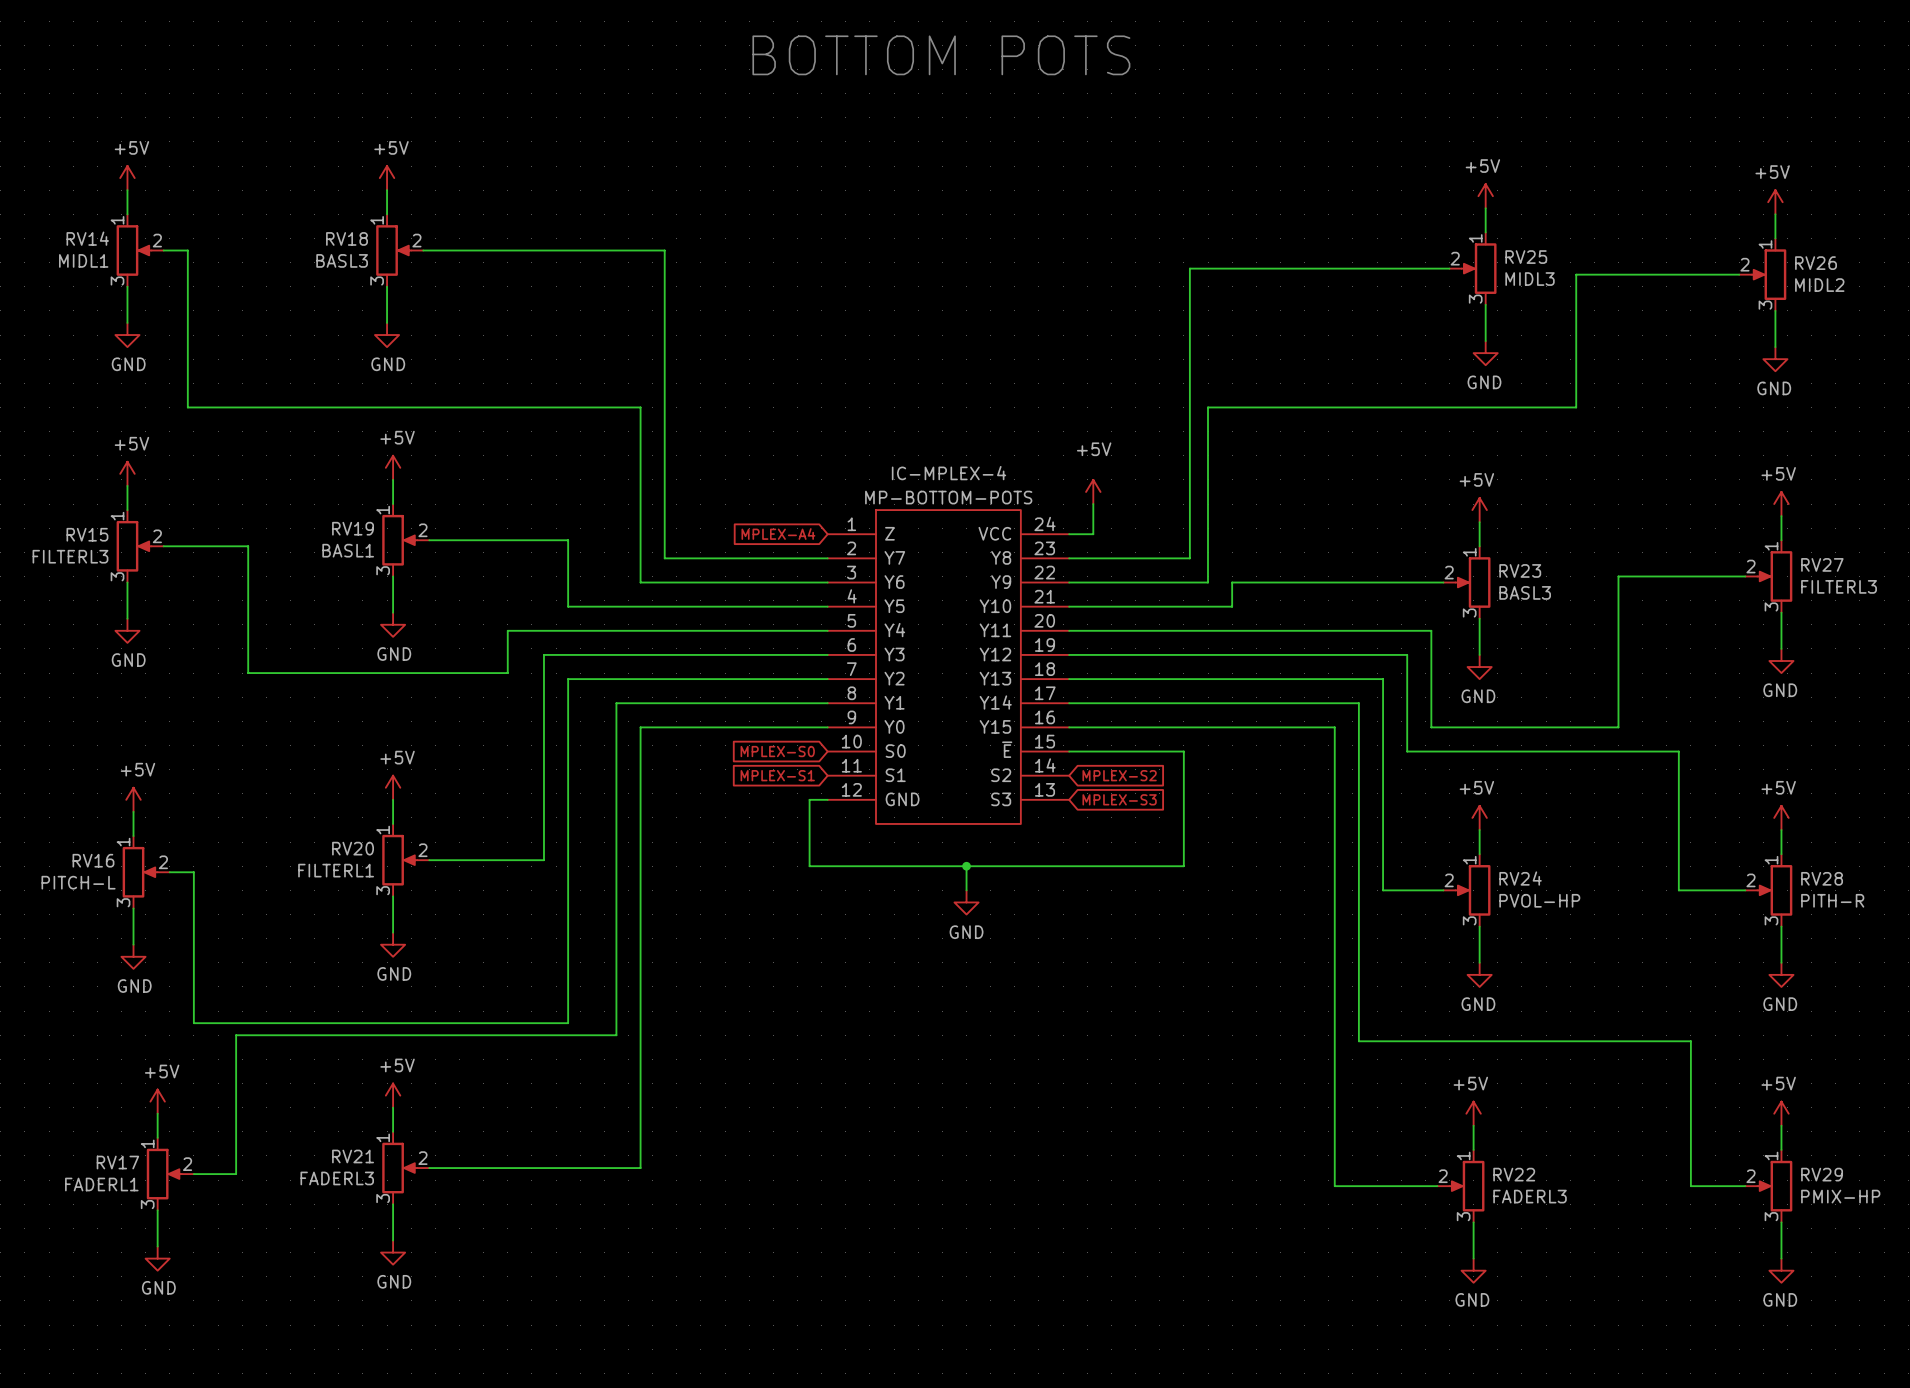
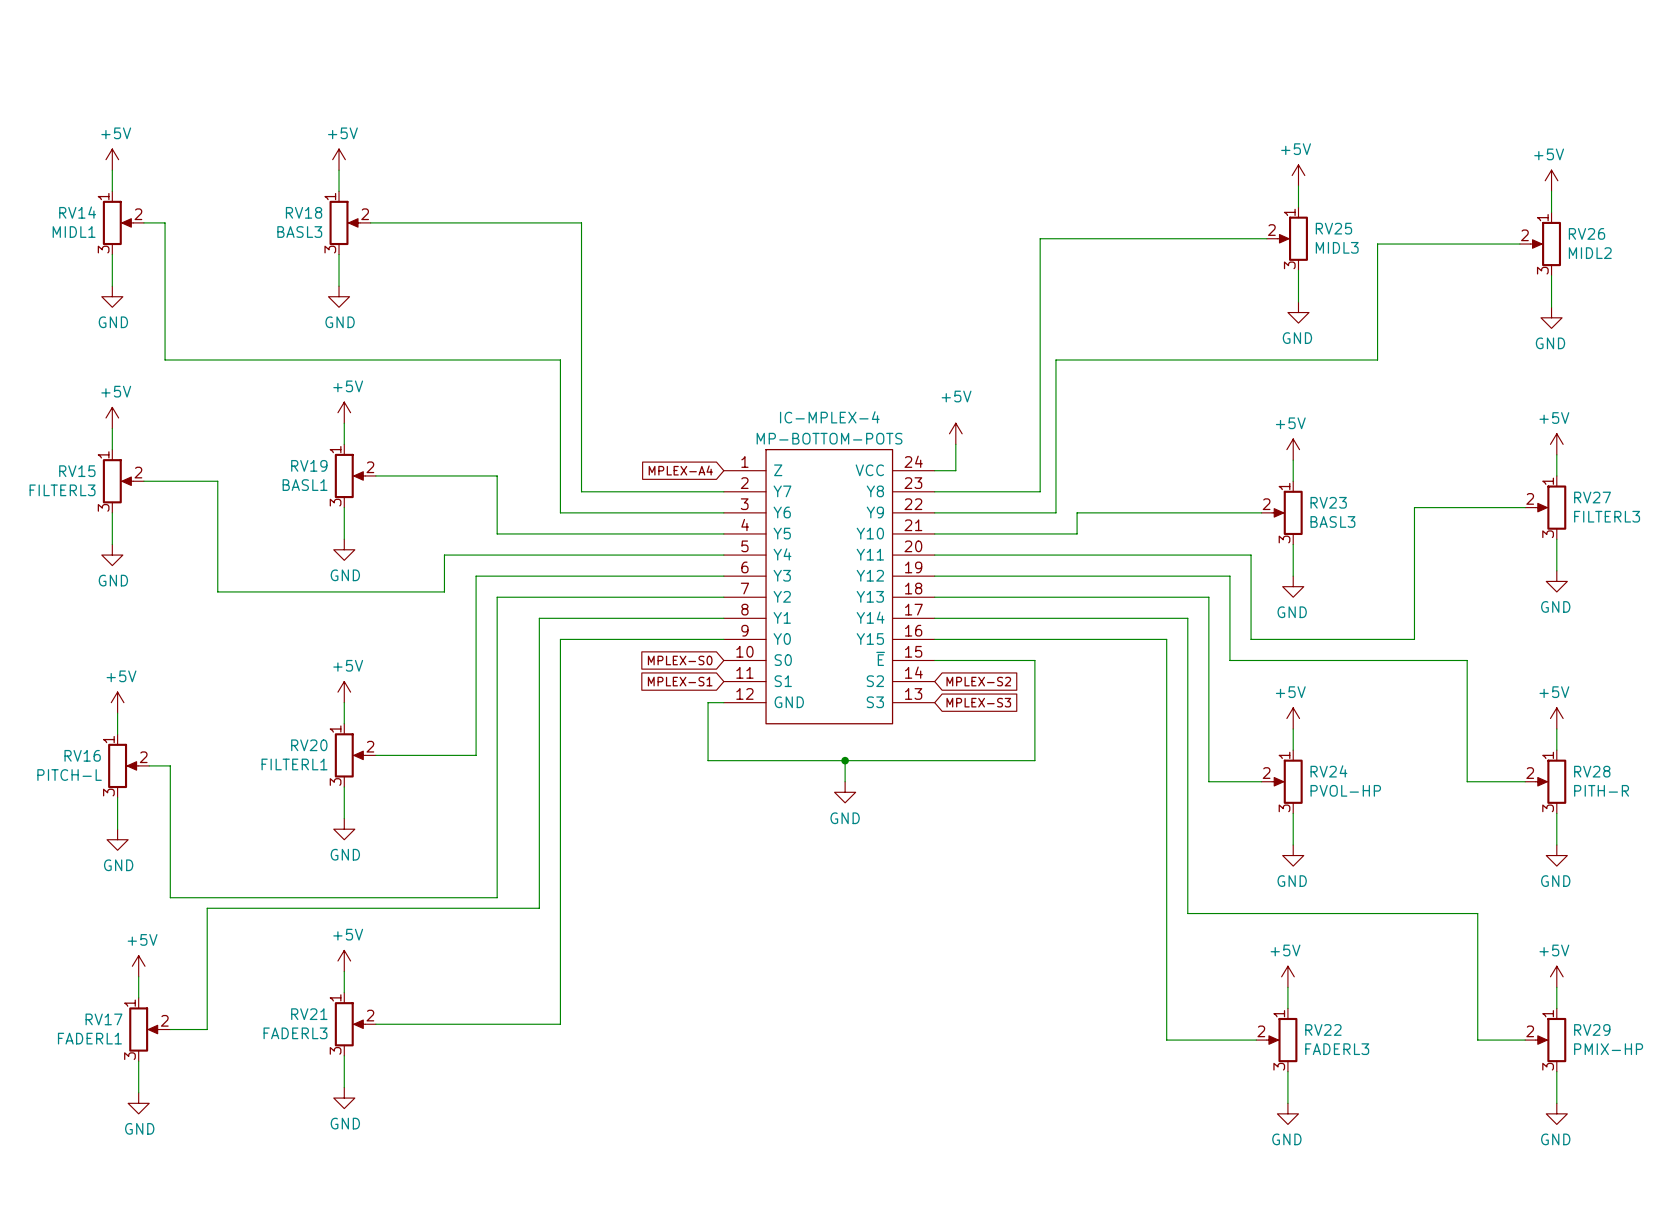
text: BOTTOM POTS (941, 55) -> none

